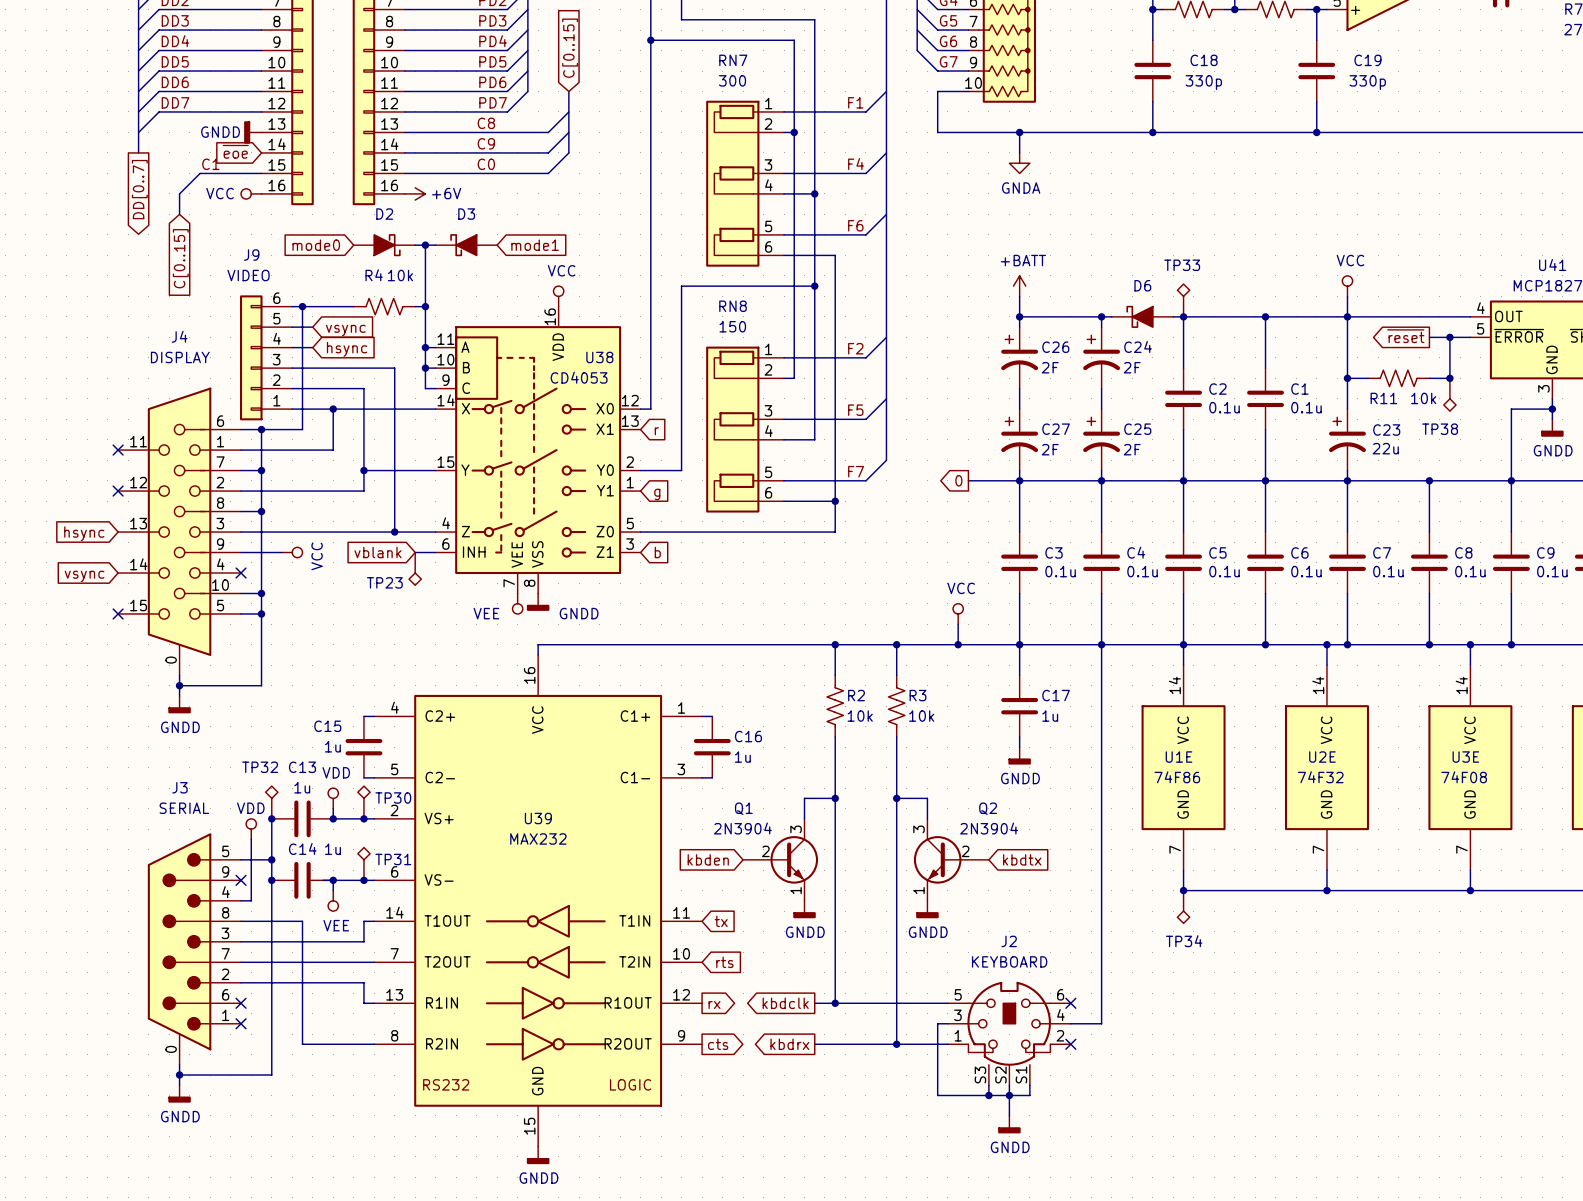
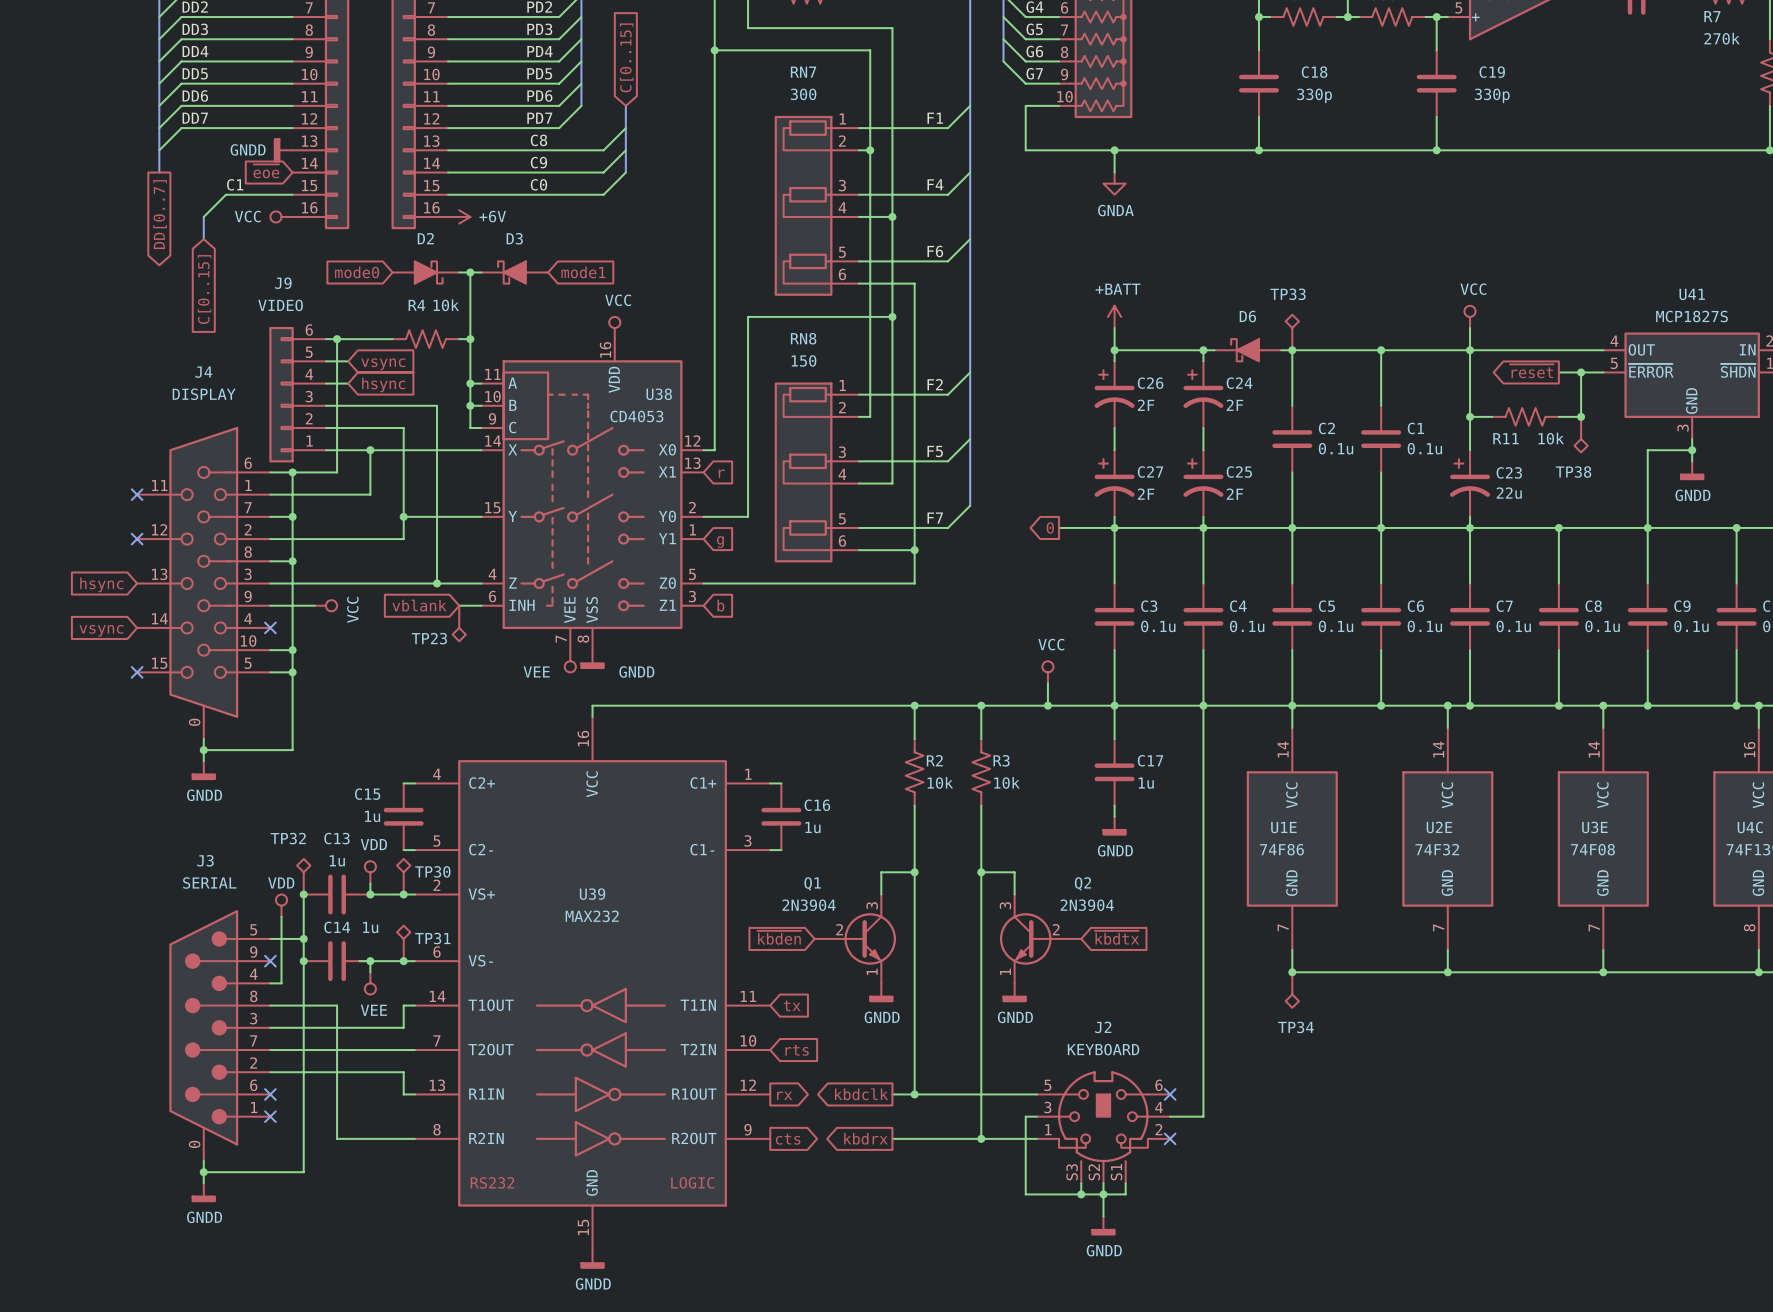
global label: kbden (708, 859) -> ~{kbden} (779, 937)
global label: kbdtx (1022, 859) -> ~{kbdtx} (1116, 937)

